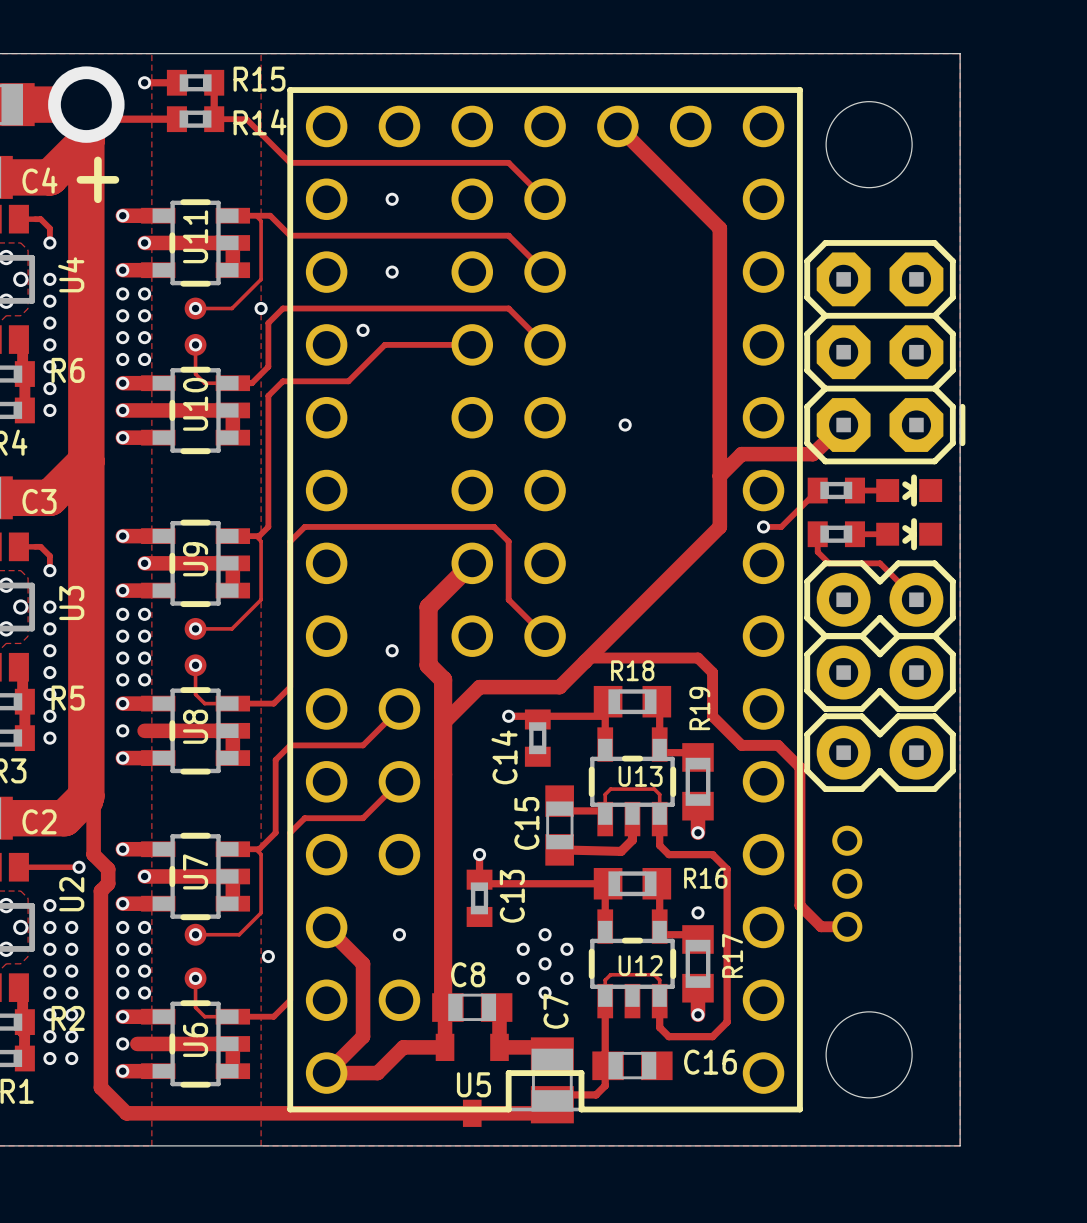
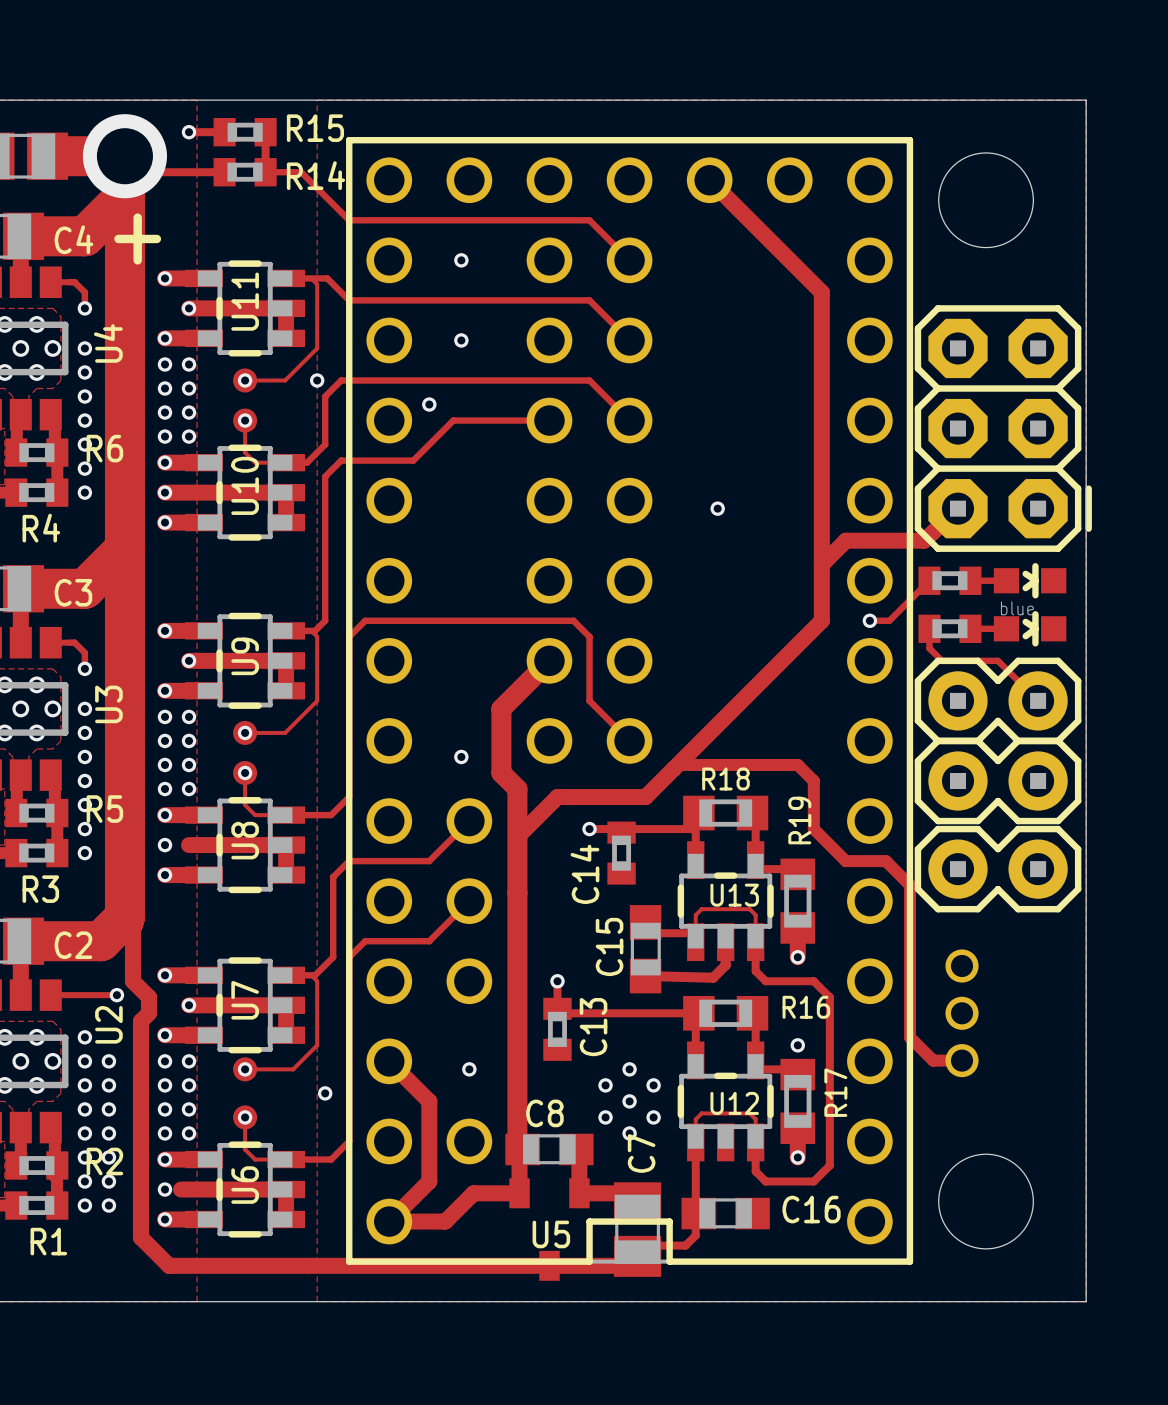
part value: none -> blue (1017, 608)

